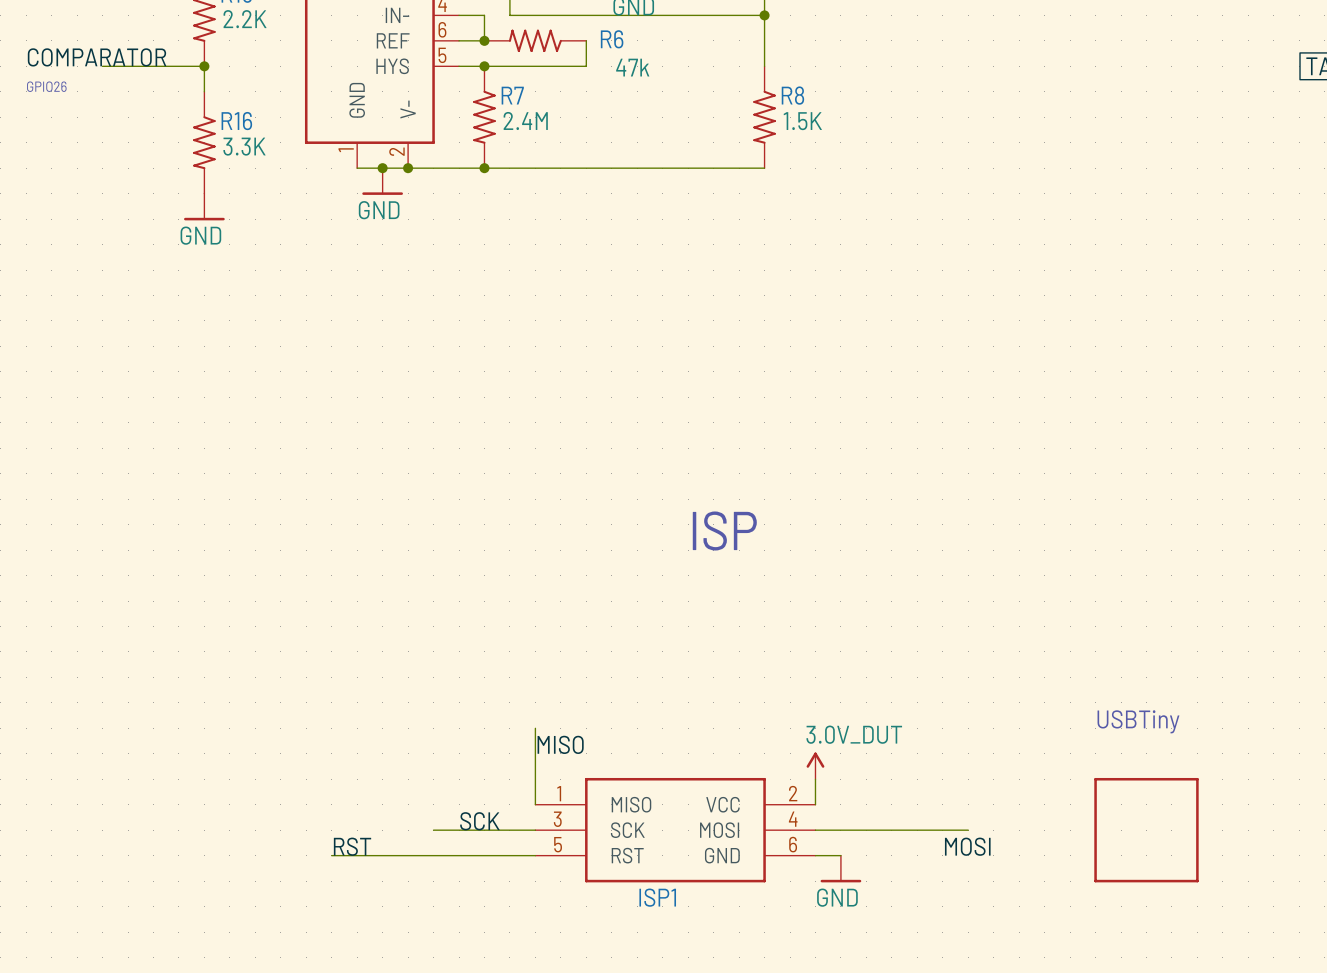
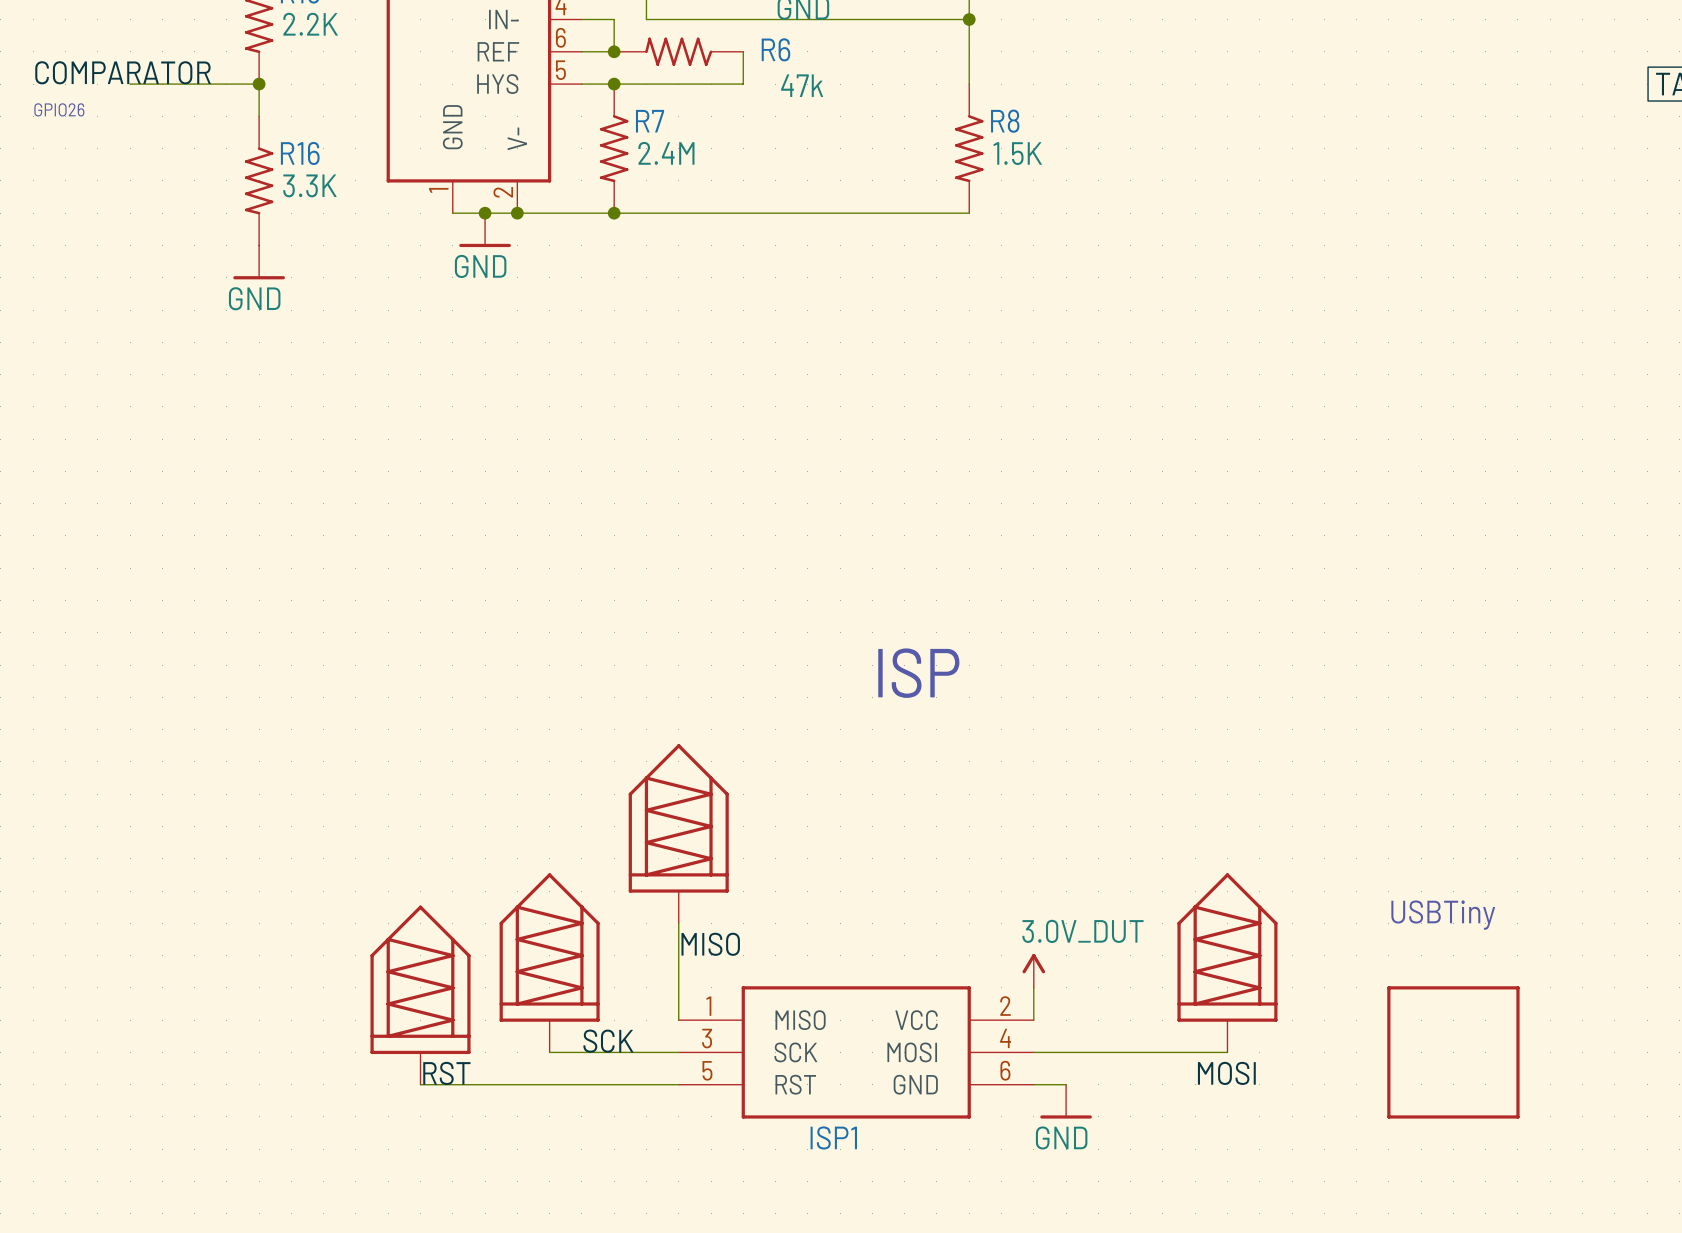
part: none -> (678, 833)
part: none -> (549, 962)
part: none -> (1227, 962)
part: none -> (420, 995)

